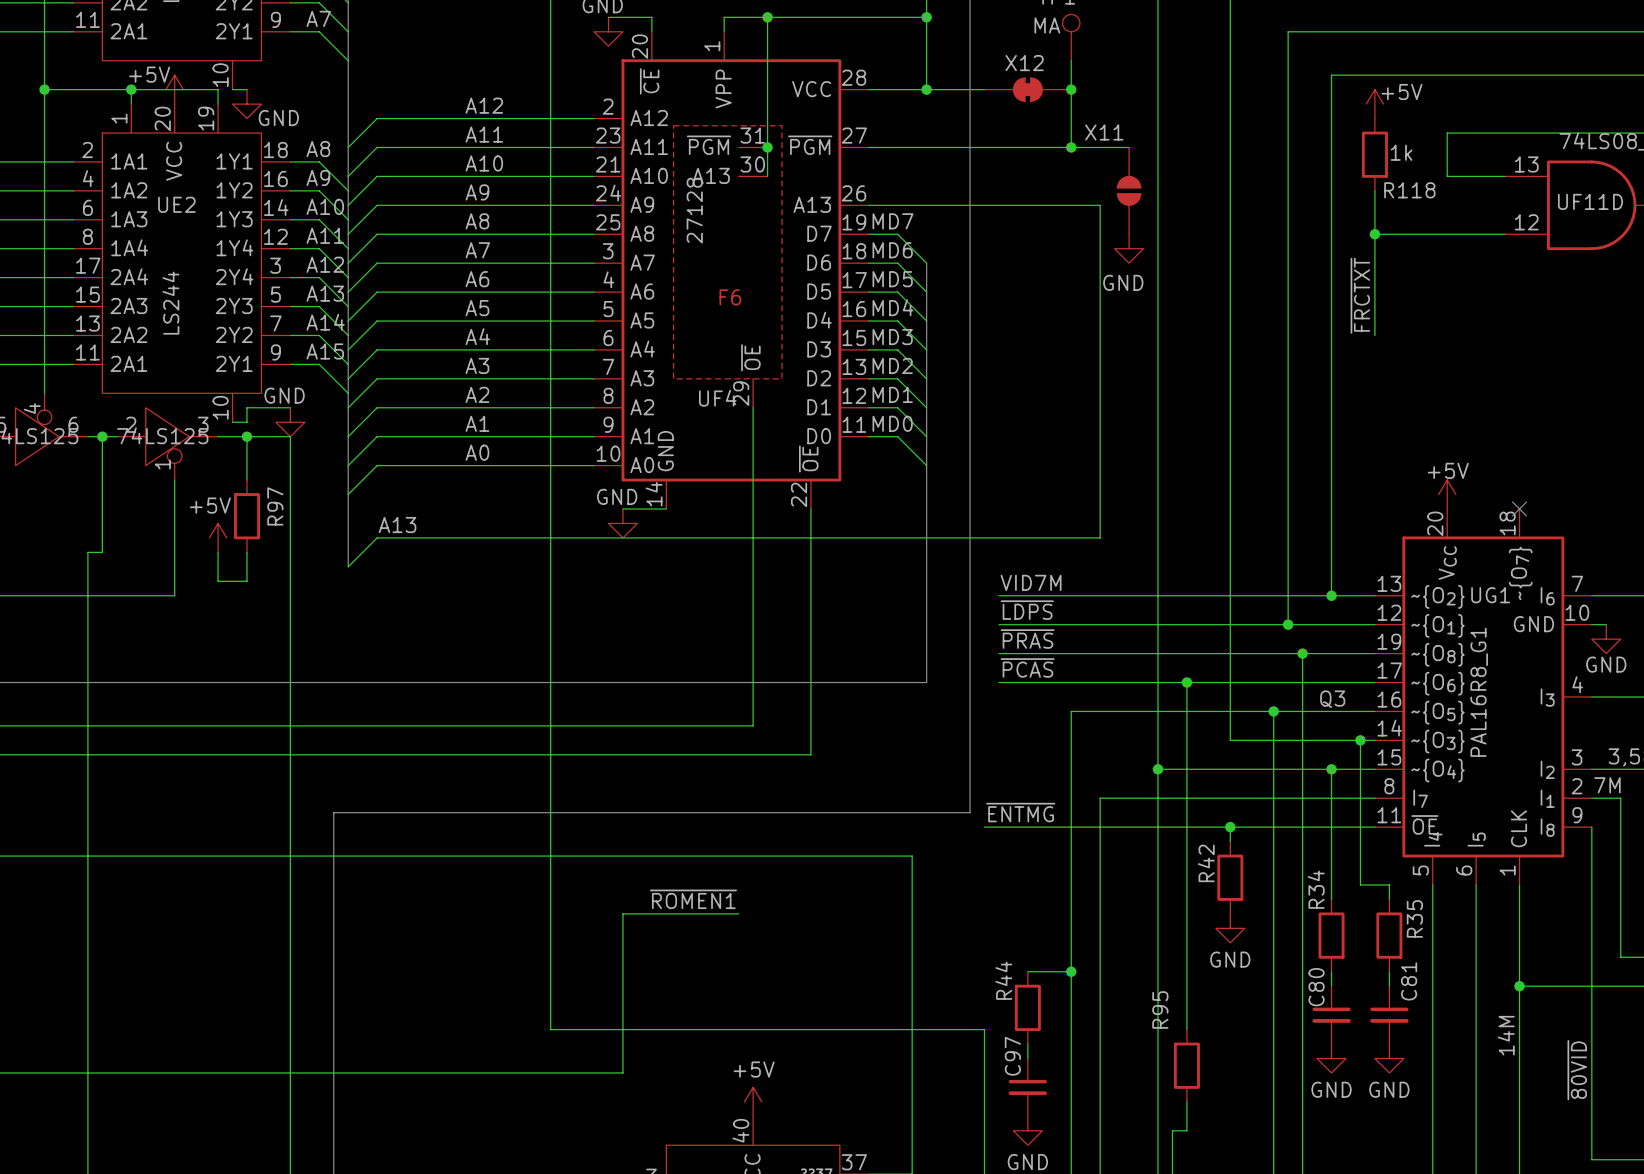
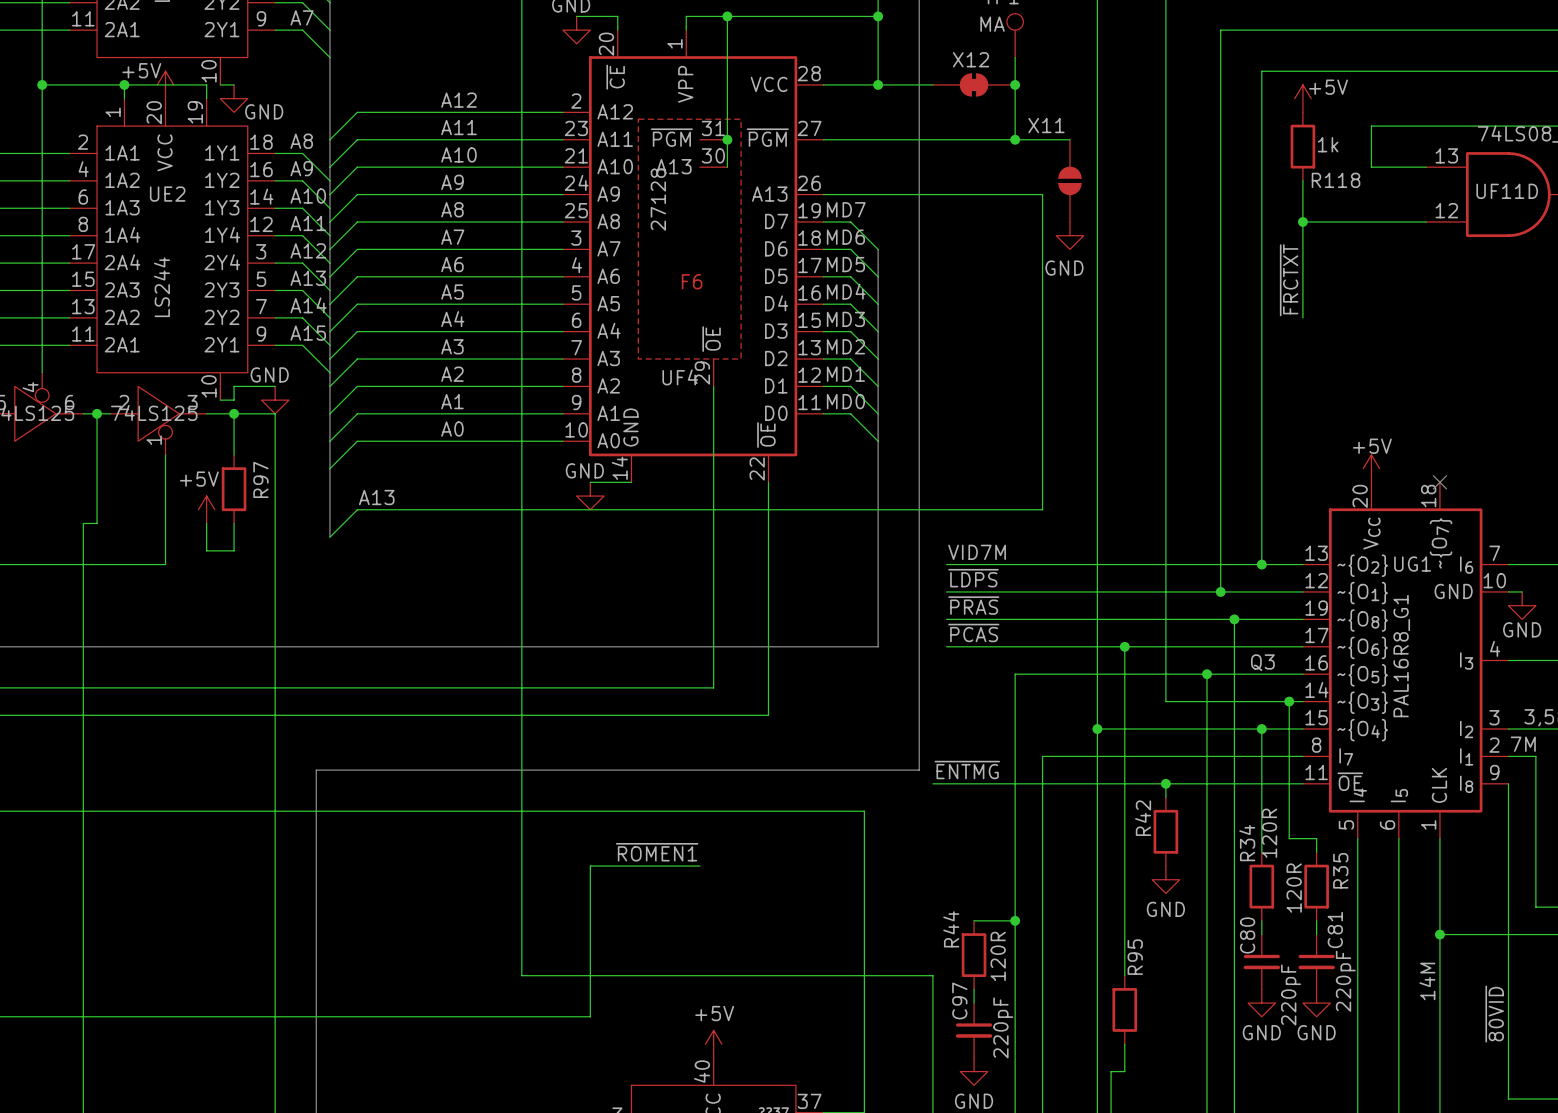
R34 value: none -> 120R (1269, 833)
R35 value: none -> 120R (1294, 888)
R44 value: none -> 120R (998, 956)
R95 name position: R95 (1160, 1009) -> R95 (1135, 957)
C81 value: none -> 220pF (1345, 981)
C80 value: none -> 220pF (1290, 995)
C97 value: none -> 220pF (1003, 1027)

